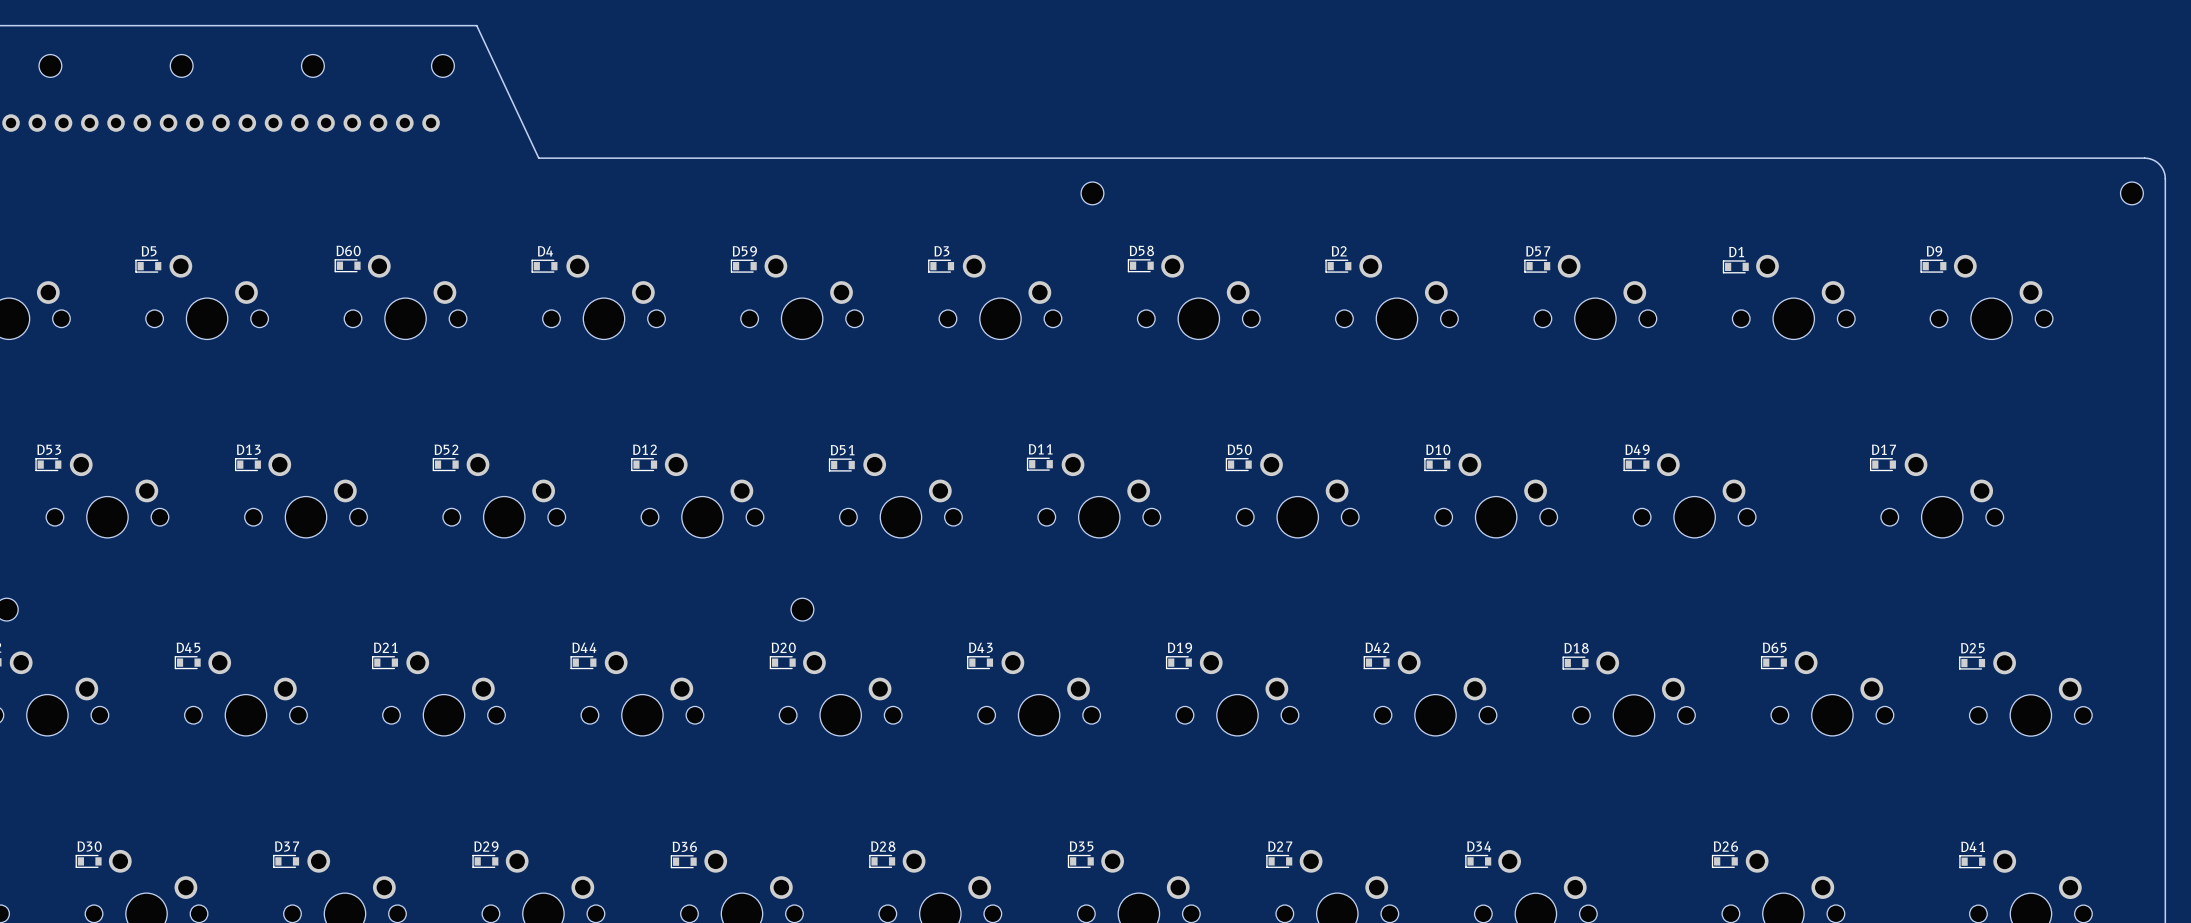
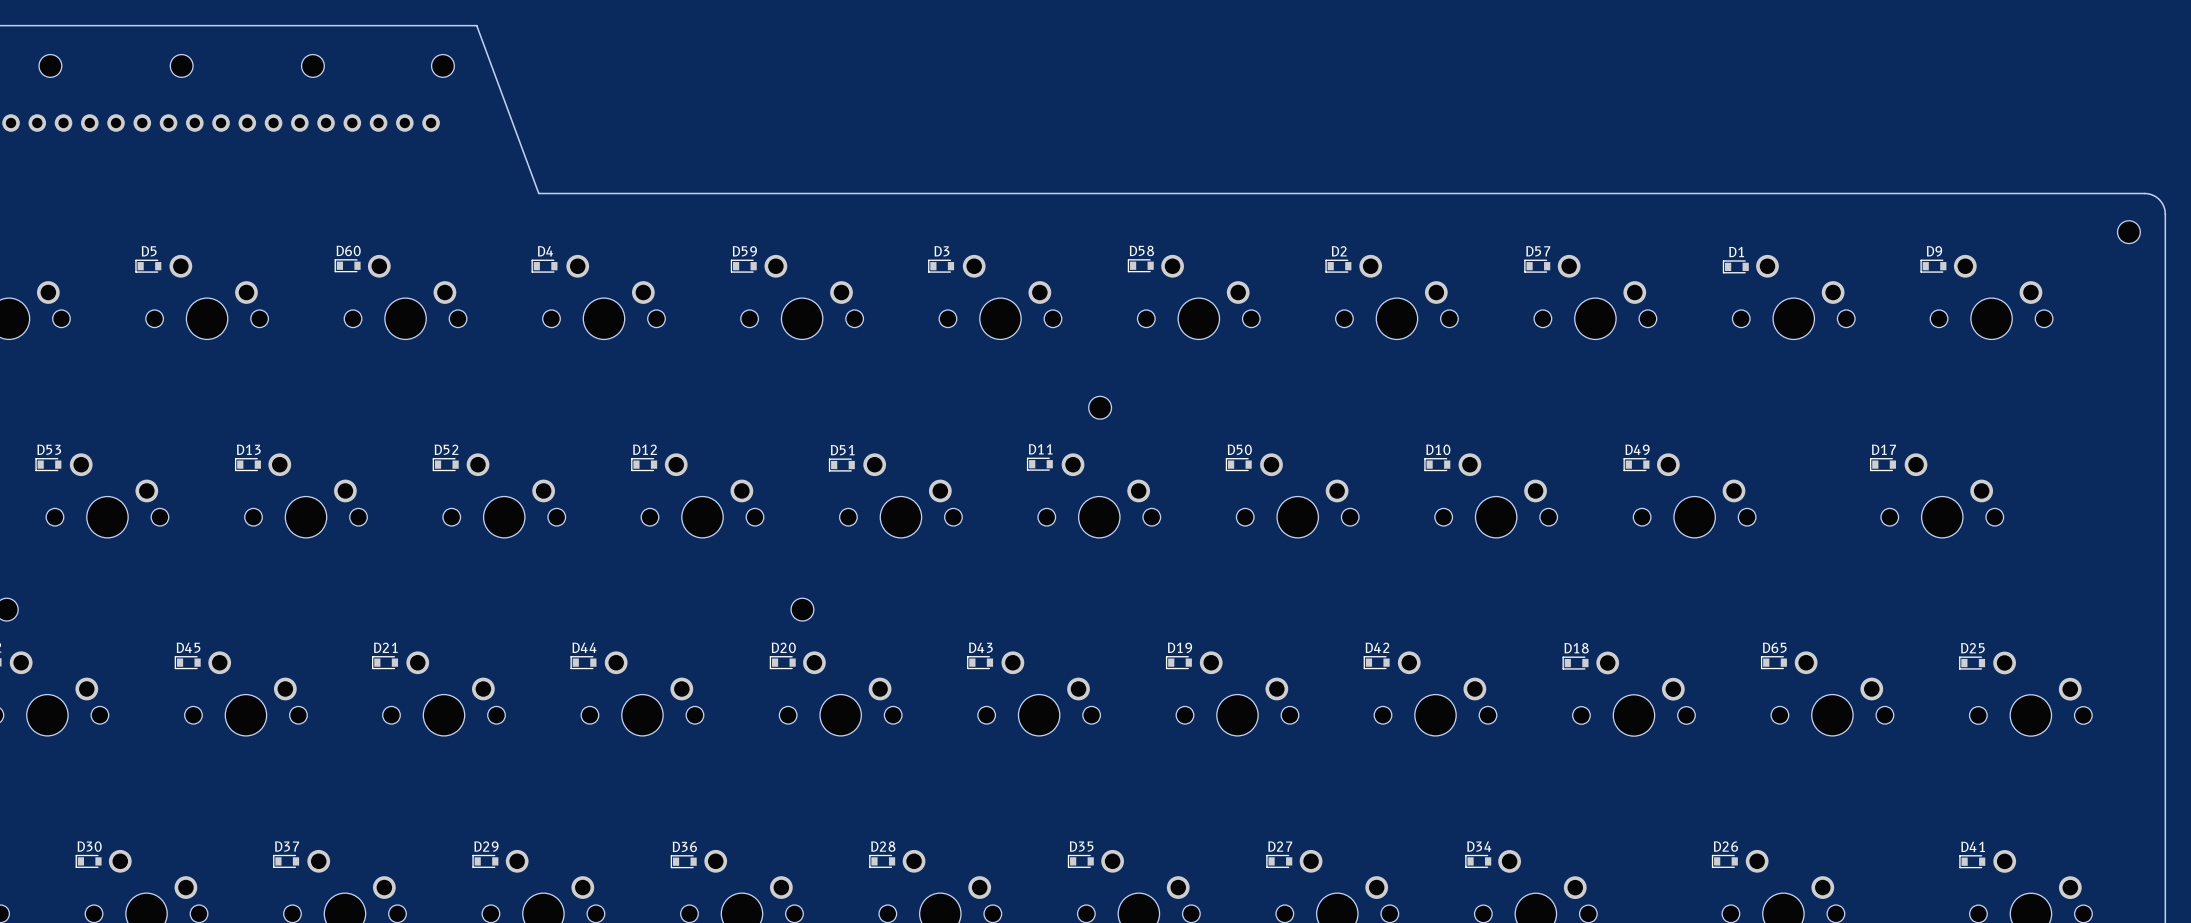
board edge: (476, 25) (538, 158) (2144, 158) (2157, 162) (2163, 170) (2165, 214) -> (476, 25) (538, 193) (2144, 193) (2152, 195) (2159, 199) (2163, 206) (2165, 214)
part position: (1092, 193) -> (1100, 407)
part position: (2131, 193) -> (2128, 232)

